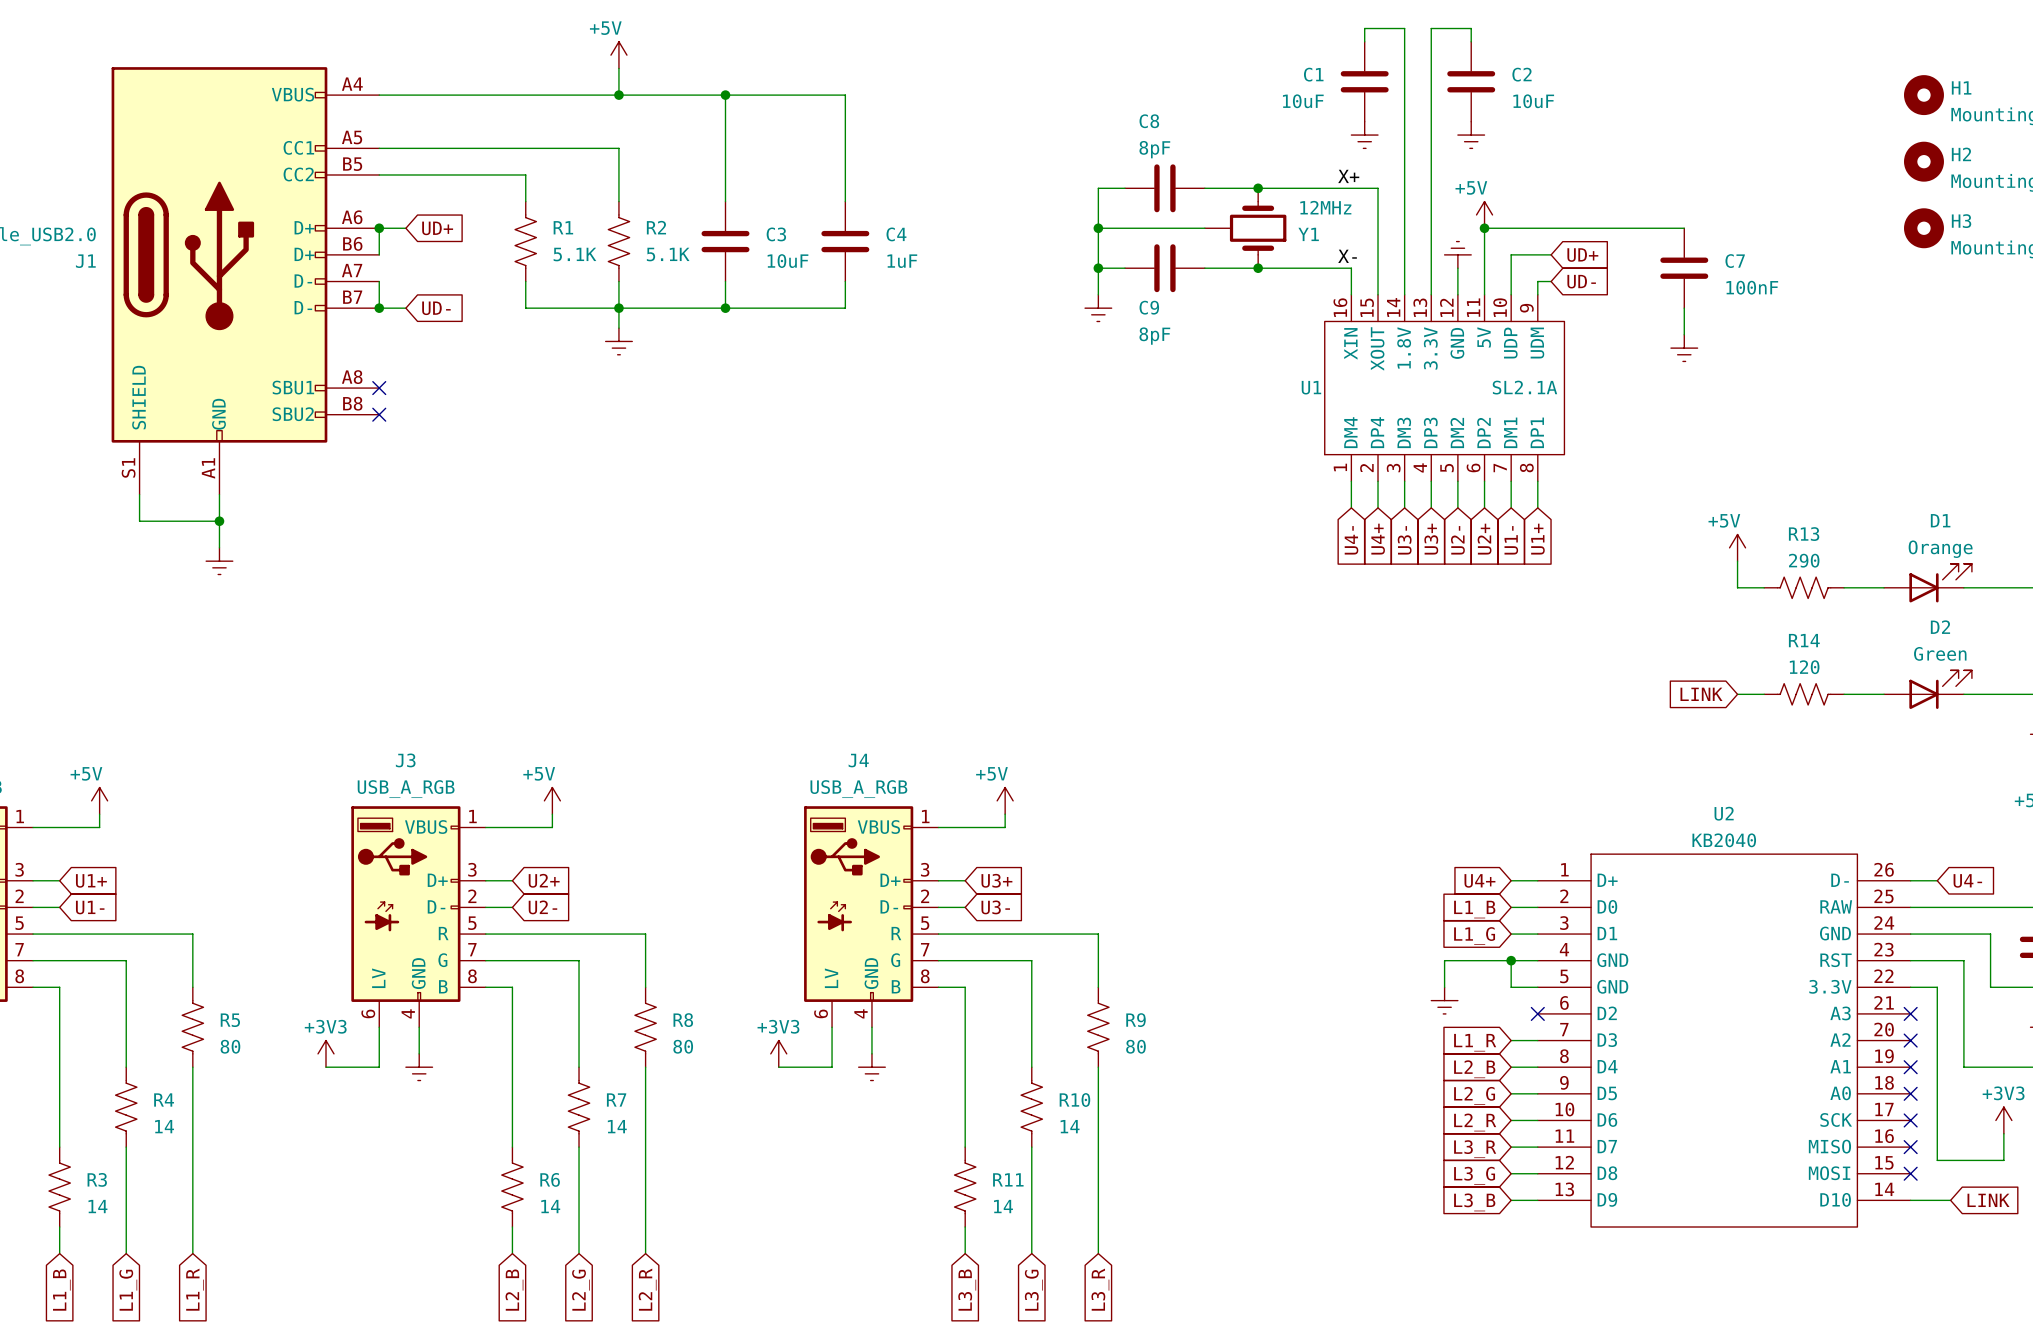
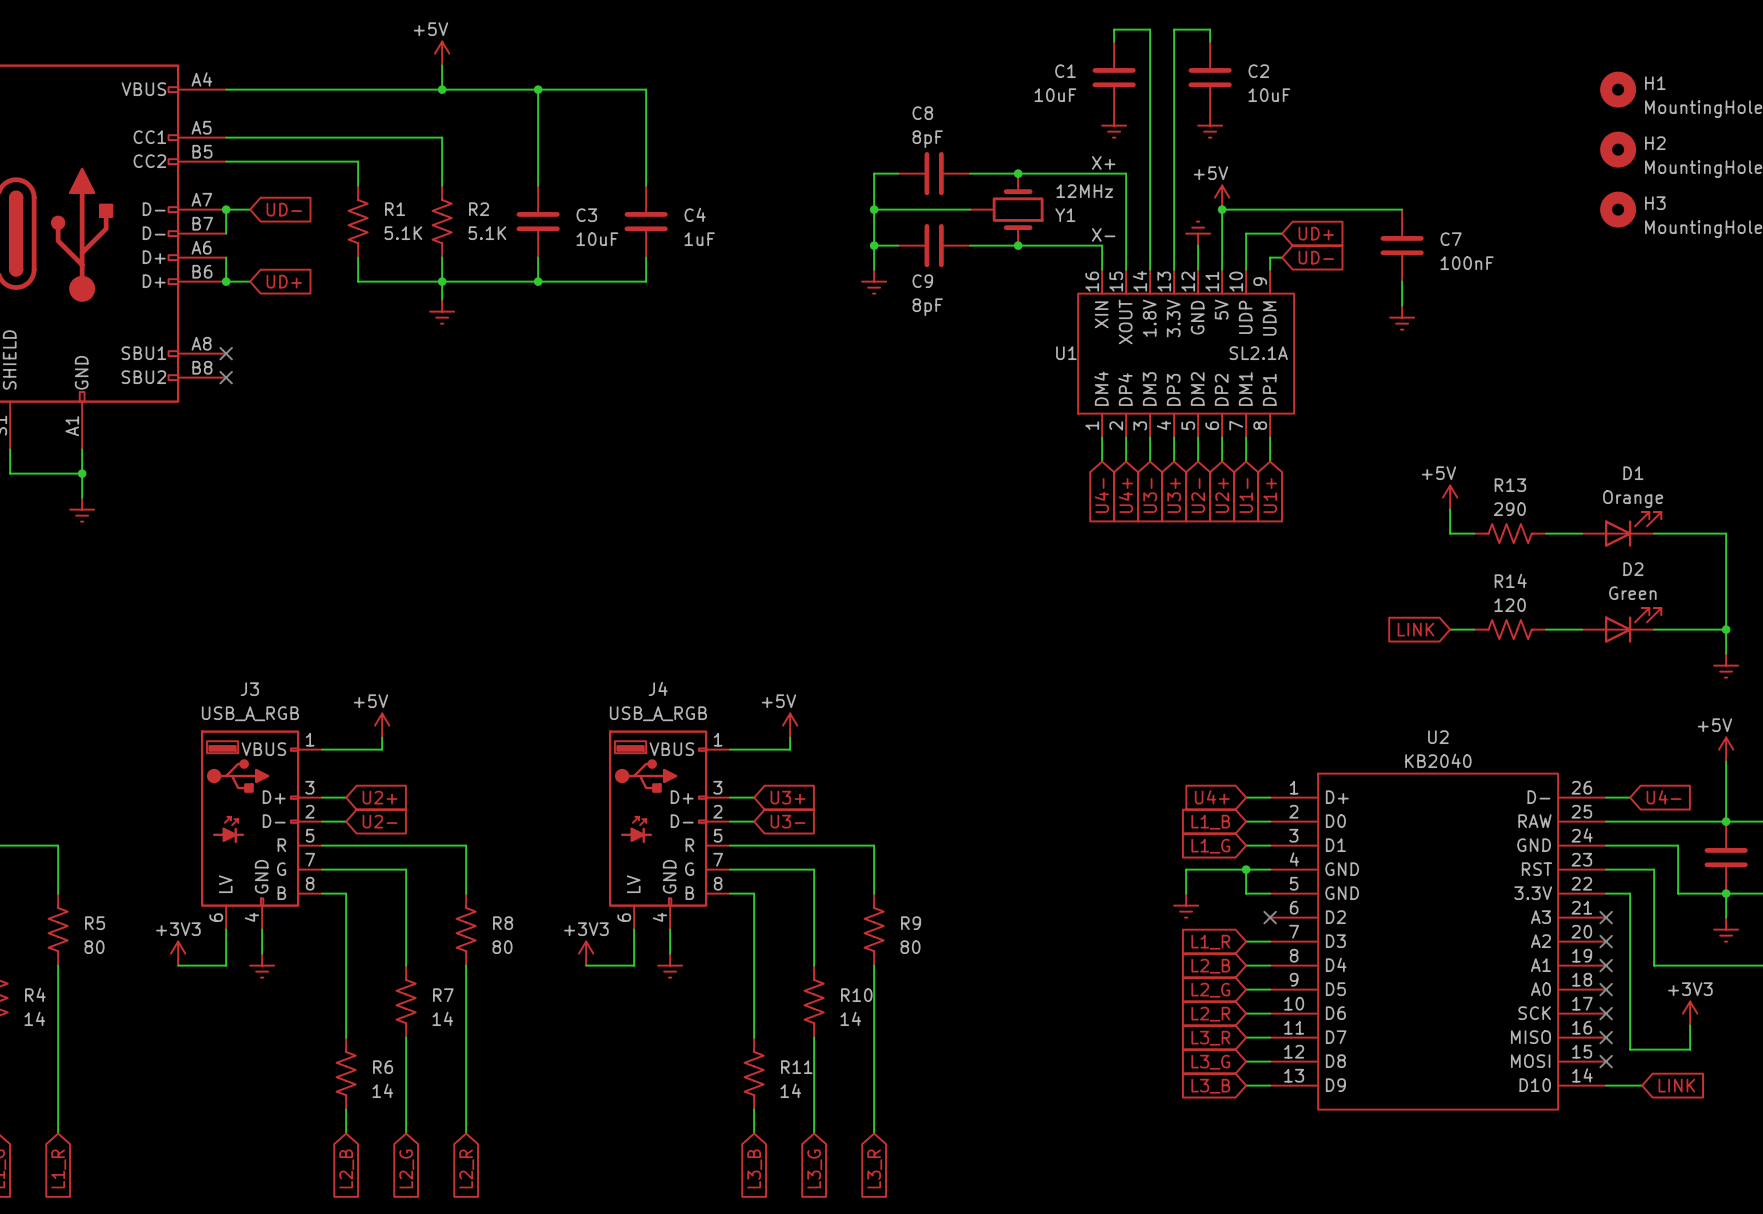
J1 pin number: A6 (352, 217) -> A7 (201, 199)
J1 pin name: D+ (304, 227) -> D- (154, 209)
global label: UD+ (437, 228) -> UD- (284, 209)
J1 pin number: B6 (352, 243) -> B7 (202, 223)
J1 pin name: D+ (304, 254) -> D- (154, 233)
J1 pin number: A7 (352, 270) -> A6 (201, 247)
J1 pin name: D- (303, 281) -> D+ (154, 257)
J1 pin number: B7 (352, 297) -> B6 (202, 271)
J1 pin name: D- (303, 307) -> D+ (154, 281)
global label: UD- (436, 308) -> UD+ (284, 281)

